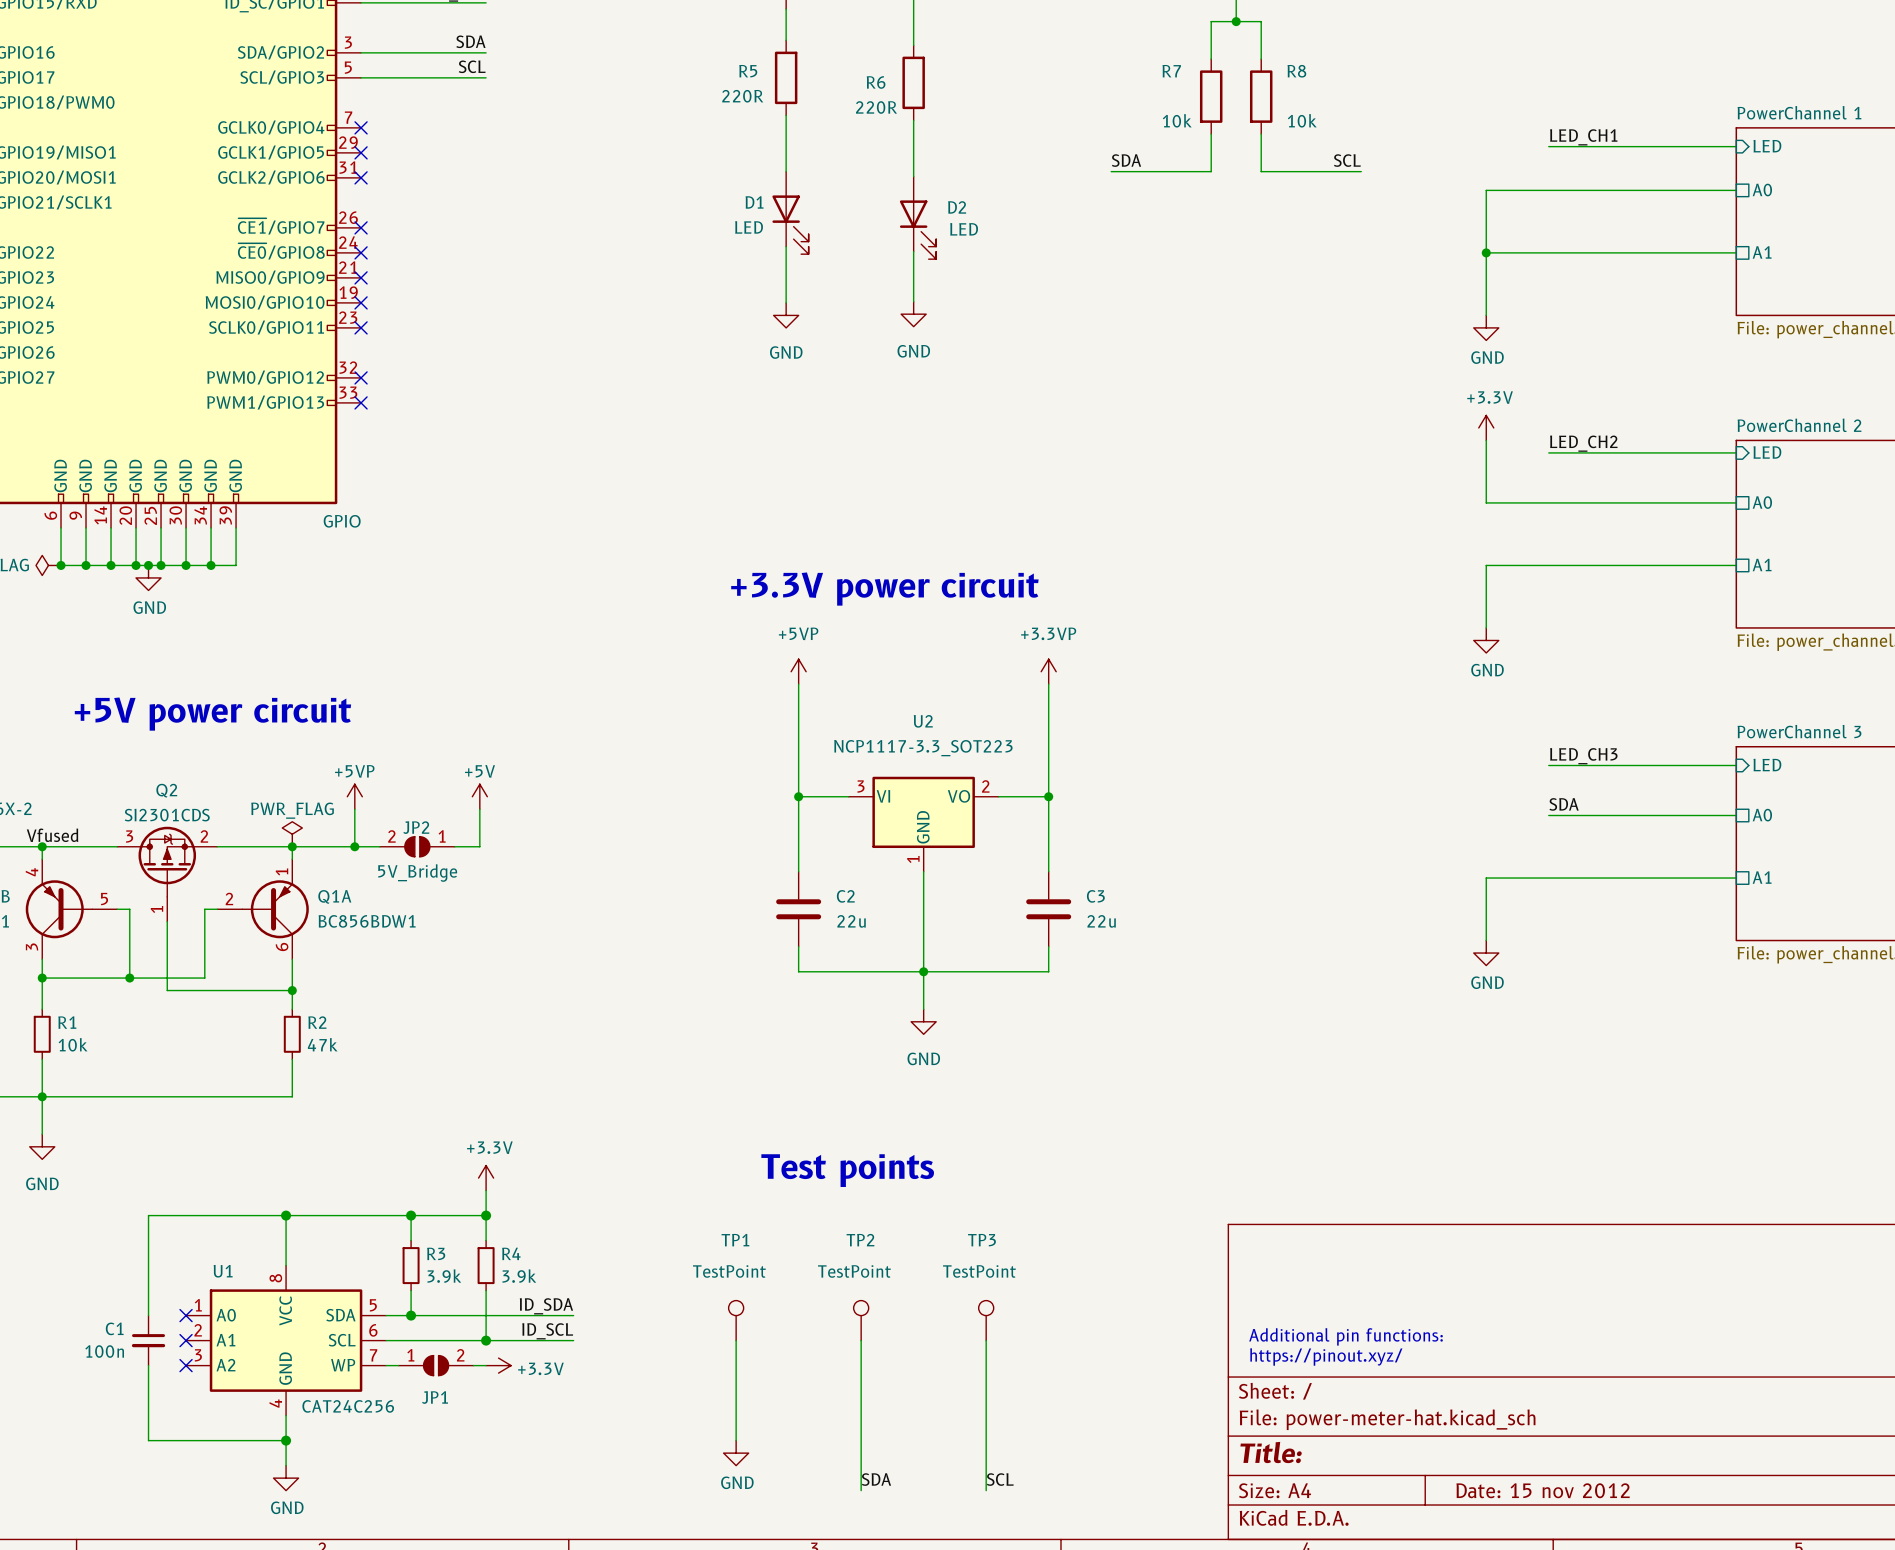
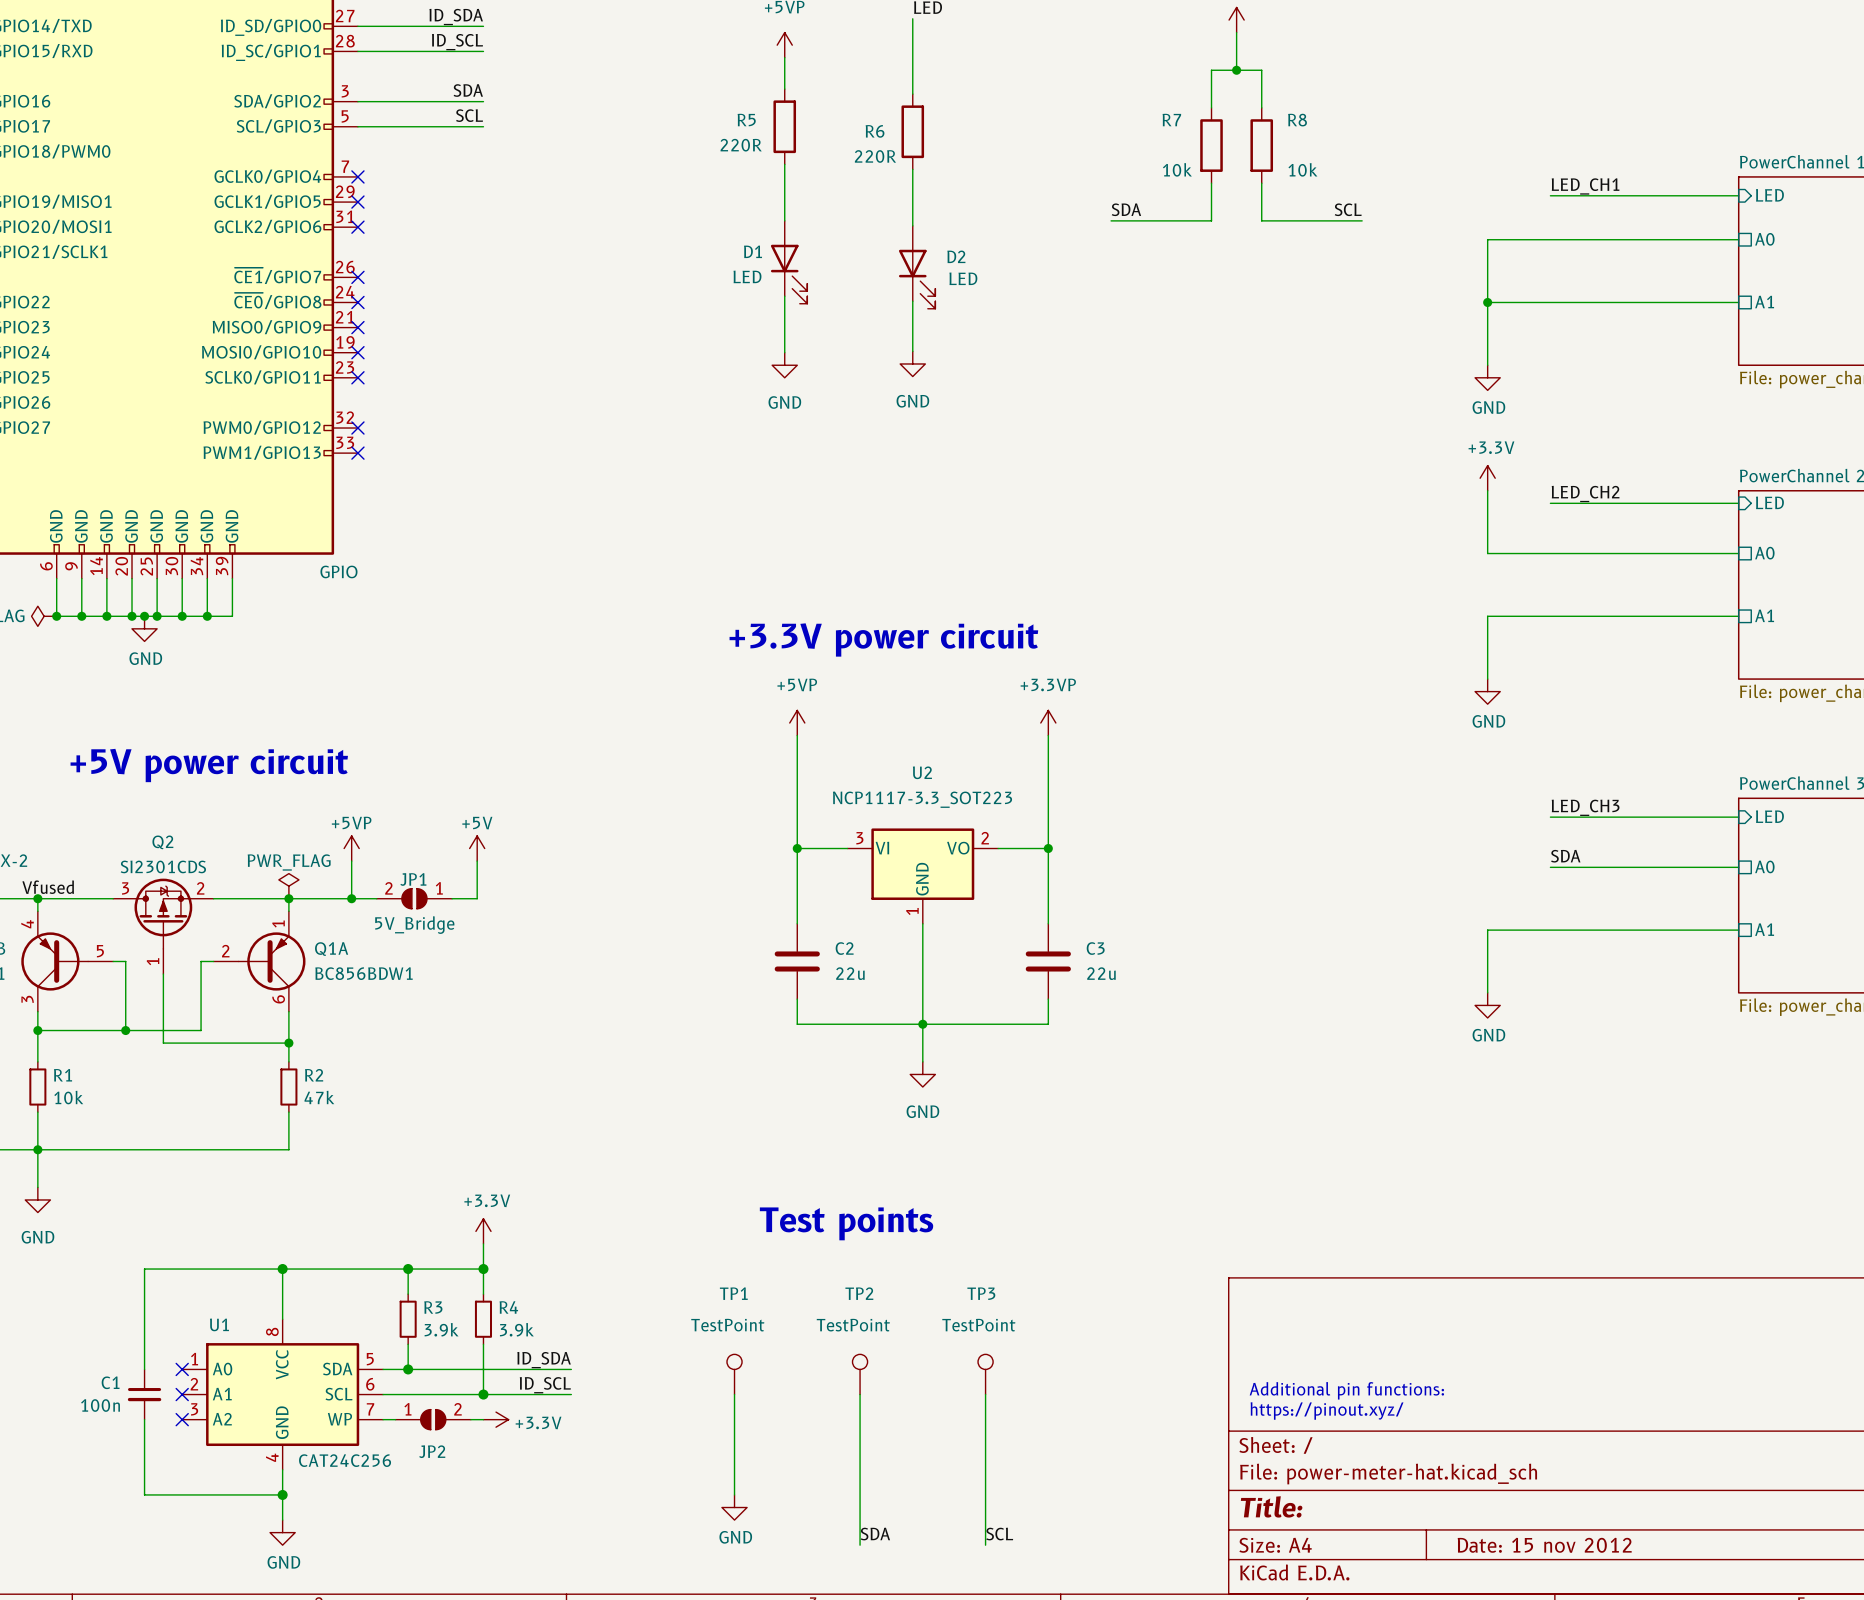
JP2 name: JP2 (416, 827) -> JP1 (413, 879)
JP1 name: JP1 (435, 1397) -> JP2 (432, 1451)

